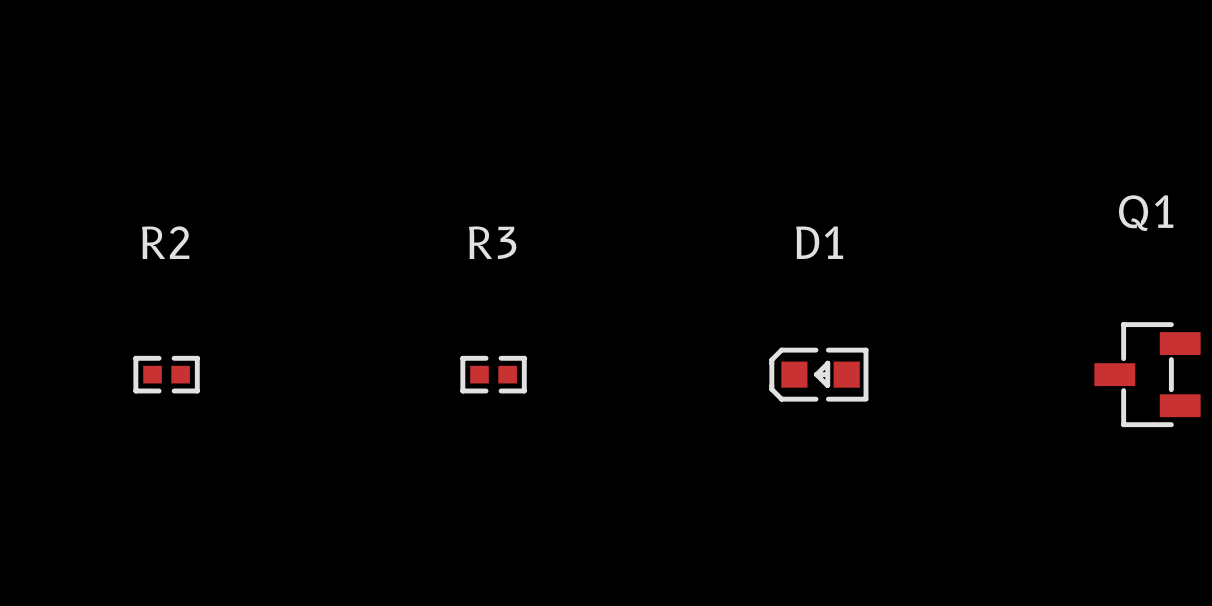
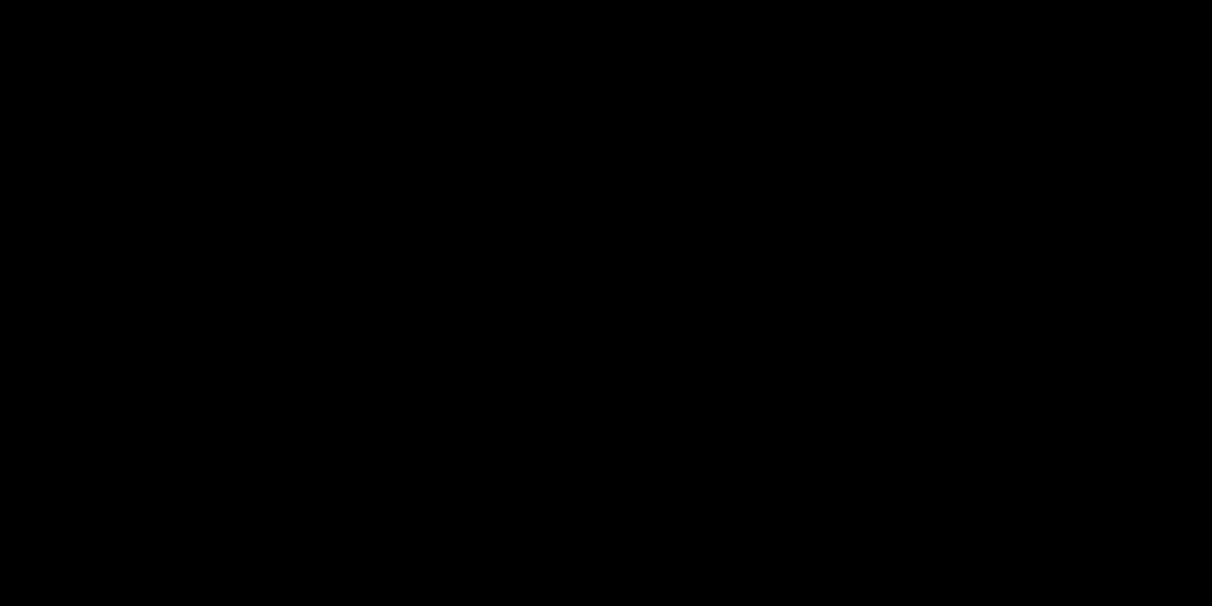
R2: (166, 374) -> none
R3: (493, 374) -> none
D1: (818, 374) -> none
Q1: (1147, 374) -> none

